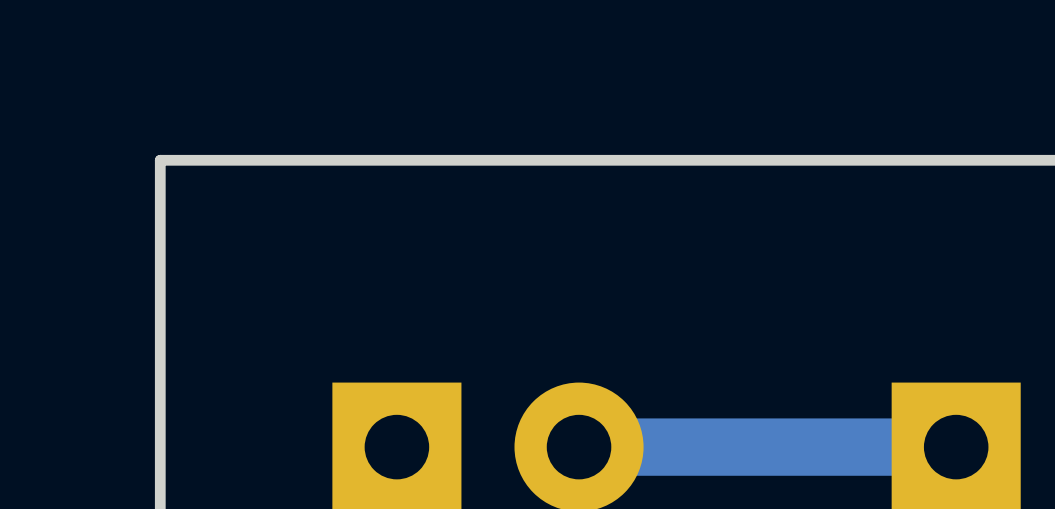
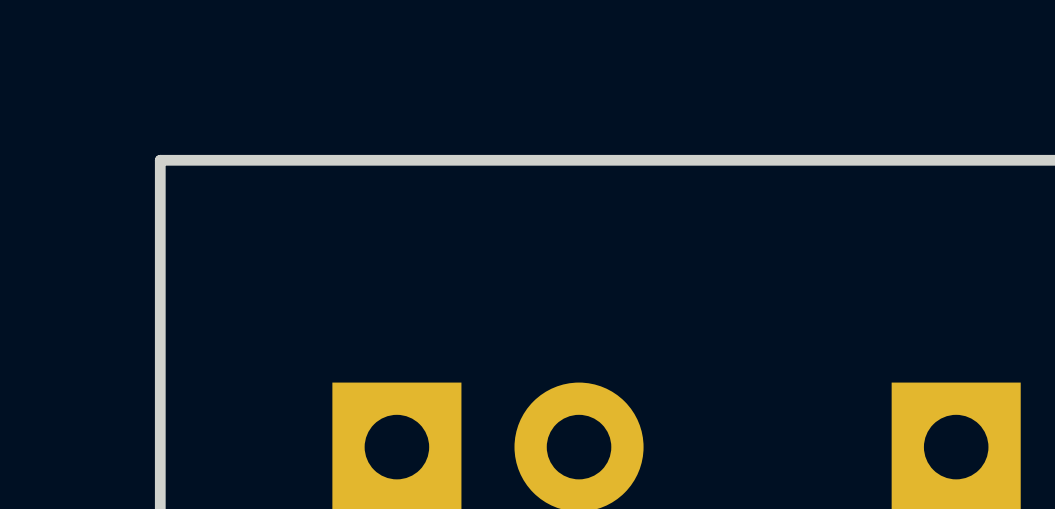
track: (956, 447) (579, 447) -> none

